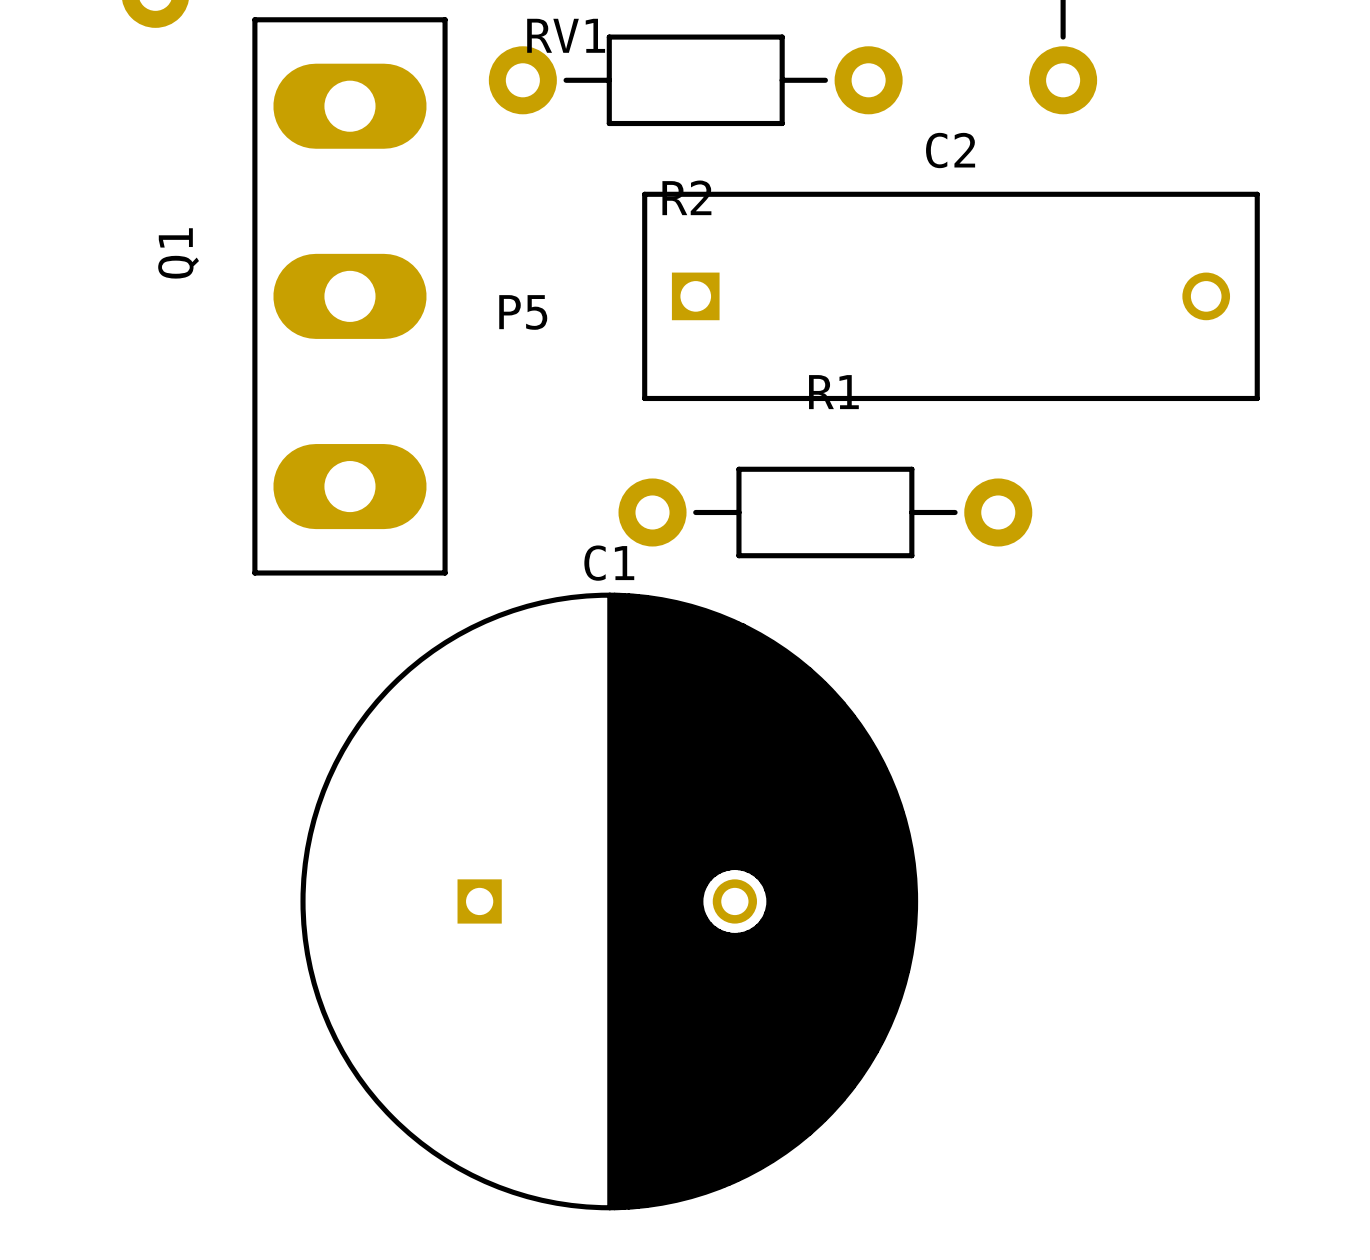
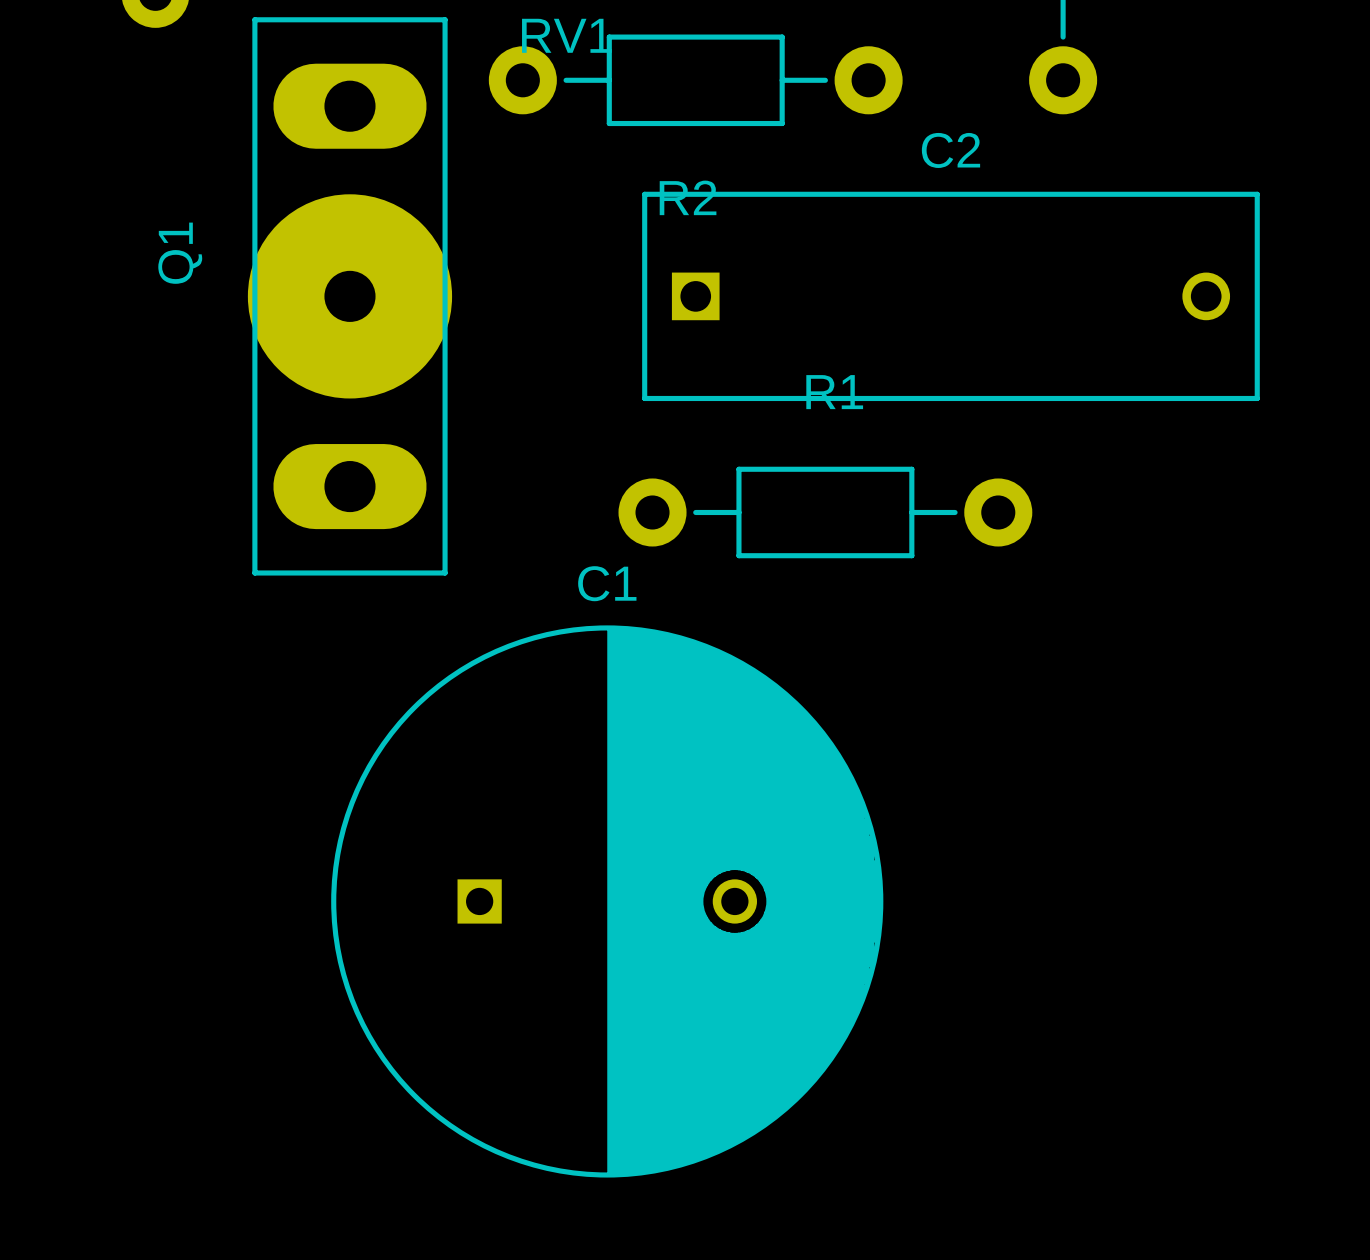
Q1 footprint: [252, 17, 448, 576] -> [247, 17, 453, 576]
P5: (523, 312) -> none
C1 footprint: [300, 592, 919, 1211] -> [331, 625, 884, 1178]

